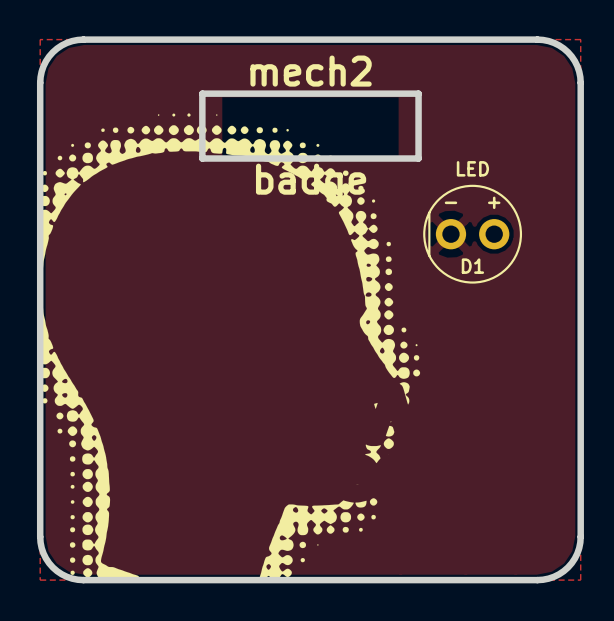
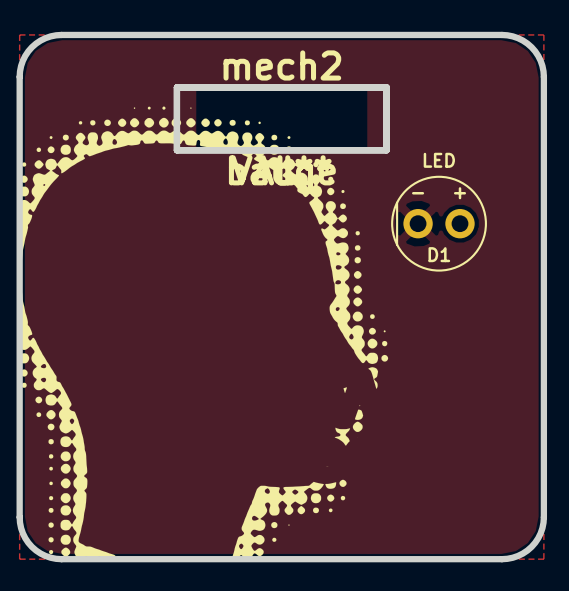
drawing: none -> [173, 84, 390, 154]

